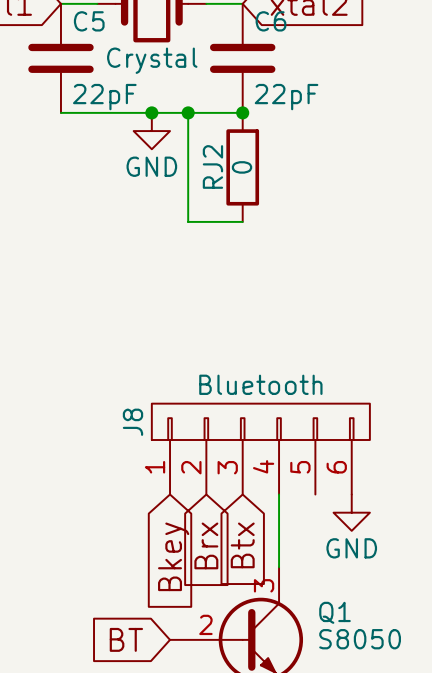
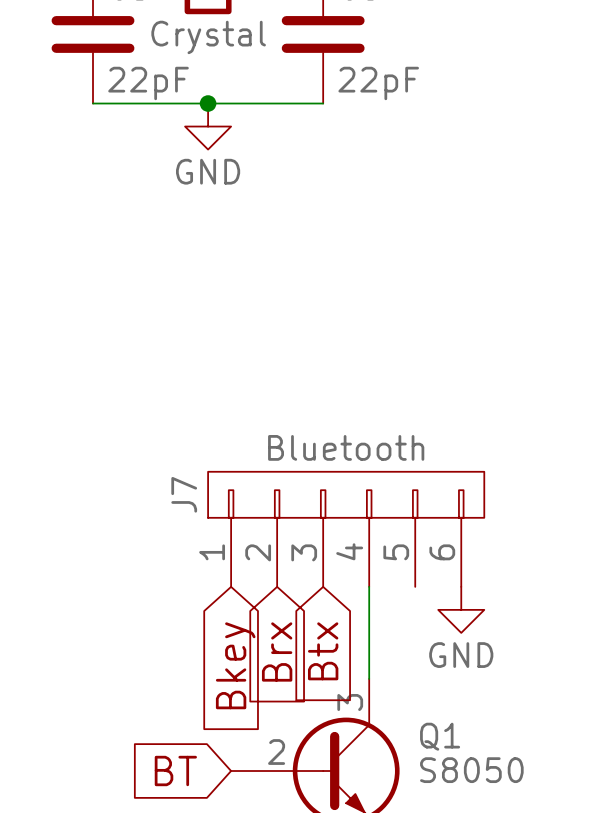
wire: (188, 112) (188, 221) (242, 221) -> none
junction: (188, 112) -> none
junction: (242, 112) -> none
RJ2: 0 (242, 167) -> none
J8 name: J8 (132, 422) -> J7 (184, 494)

